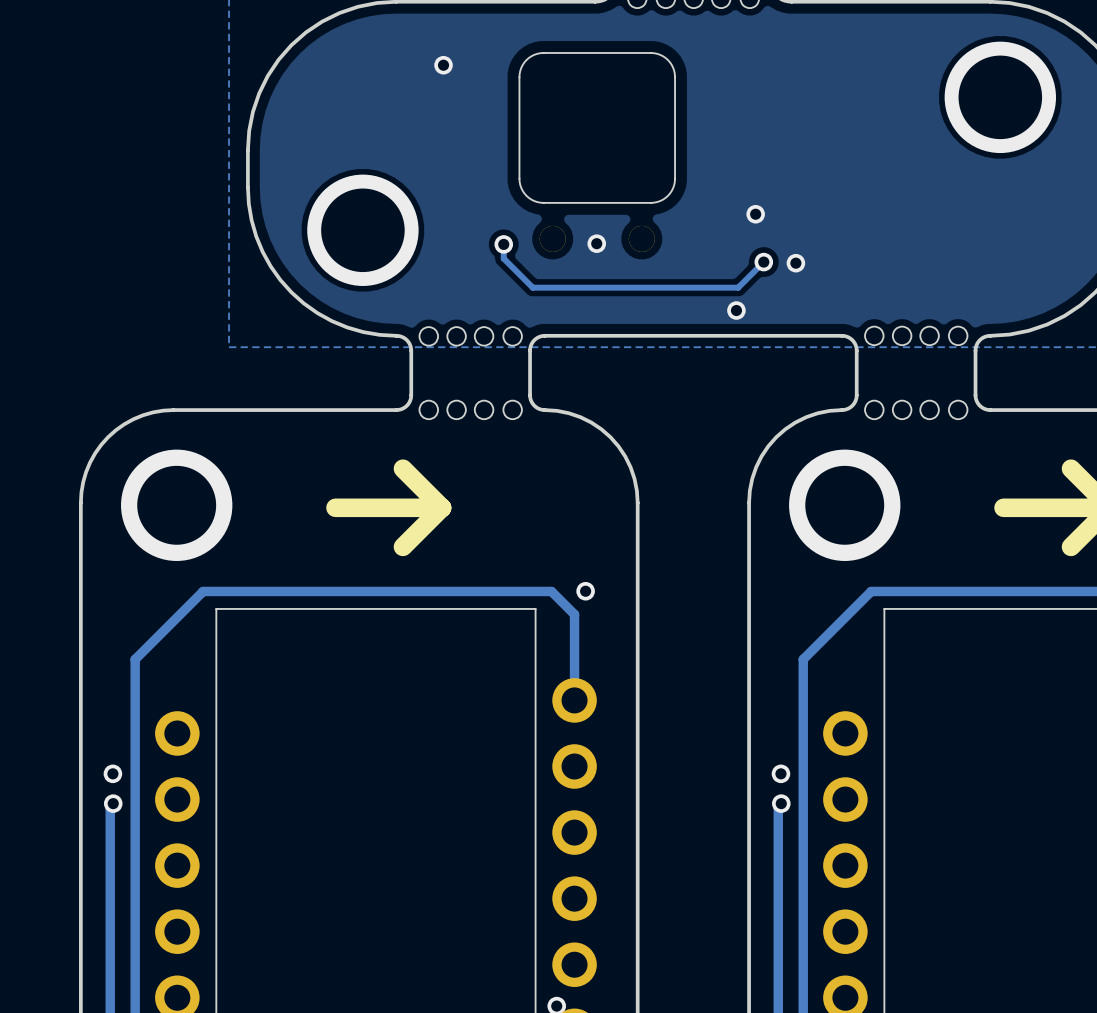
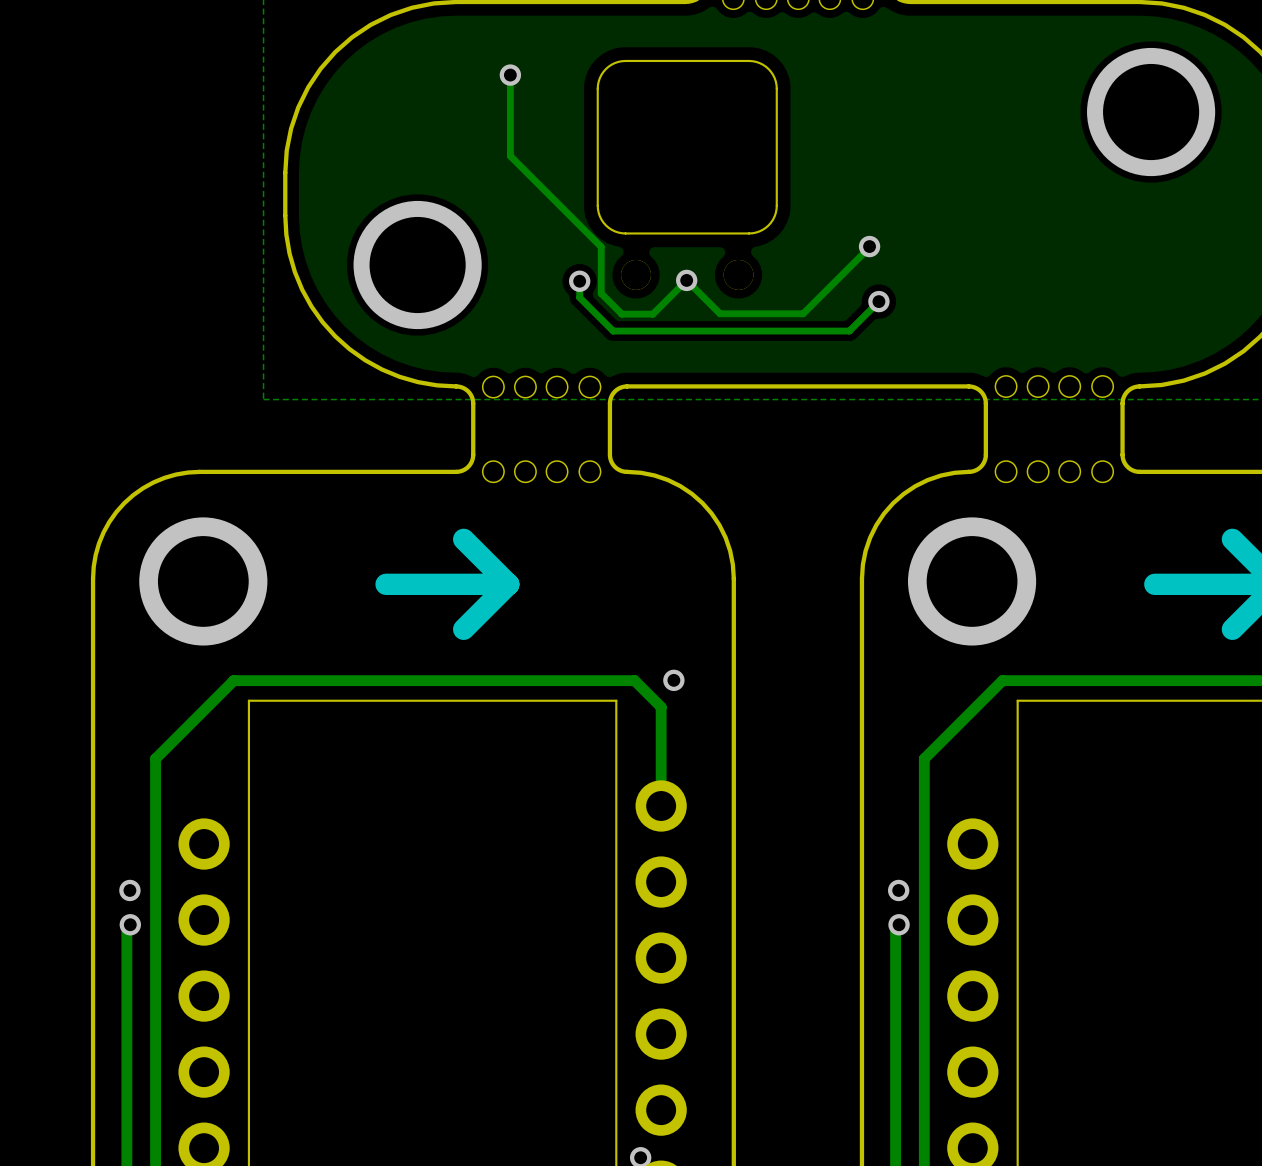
track: none -> (510, 75) (510, 156) (601, 246) (601, 293) (621, 314) (652, 314) (686, 280) (720, 313) (803, 313) (869, 247)
via: (795, 263) -> none
via: (736, 310) -> none

